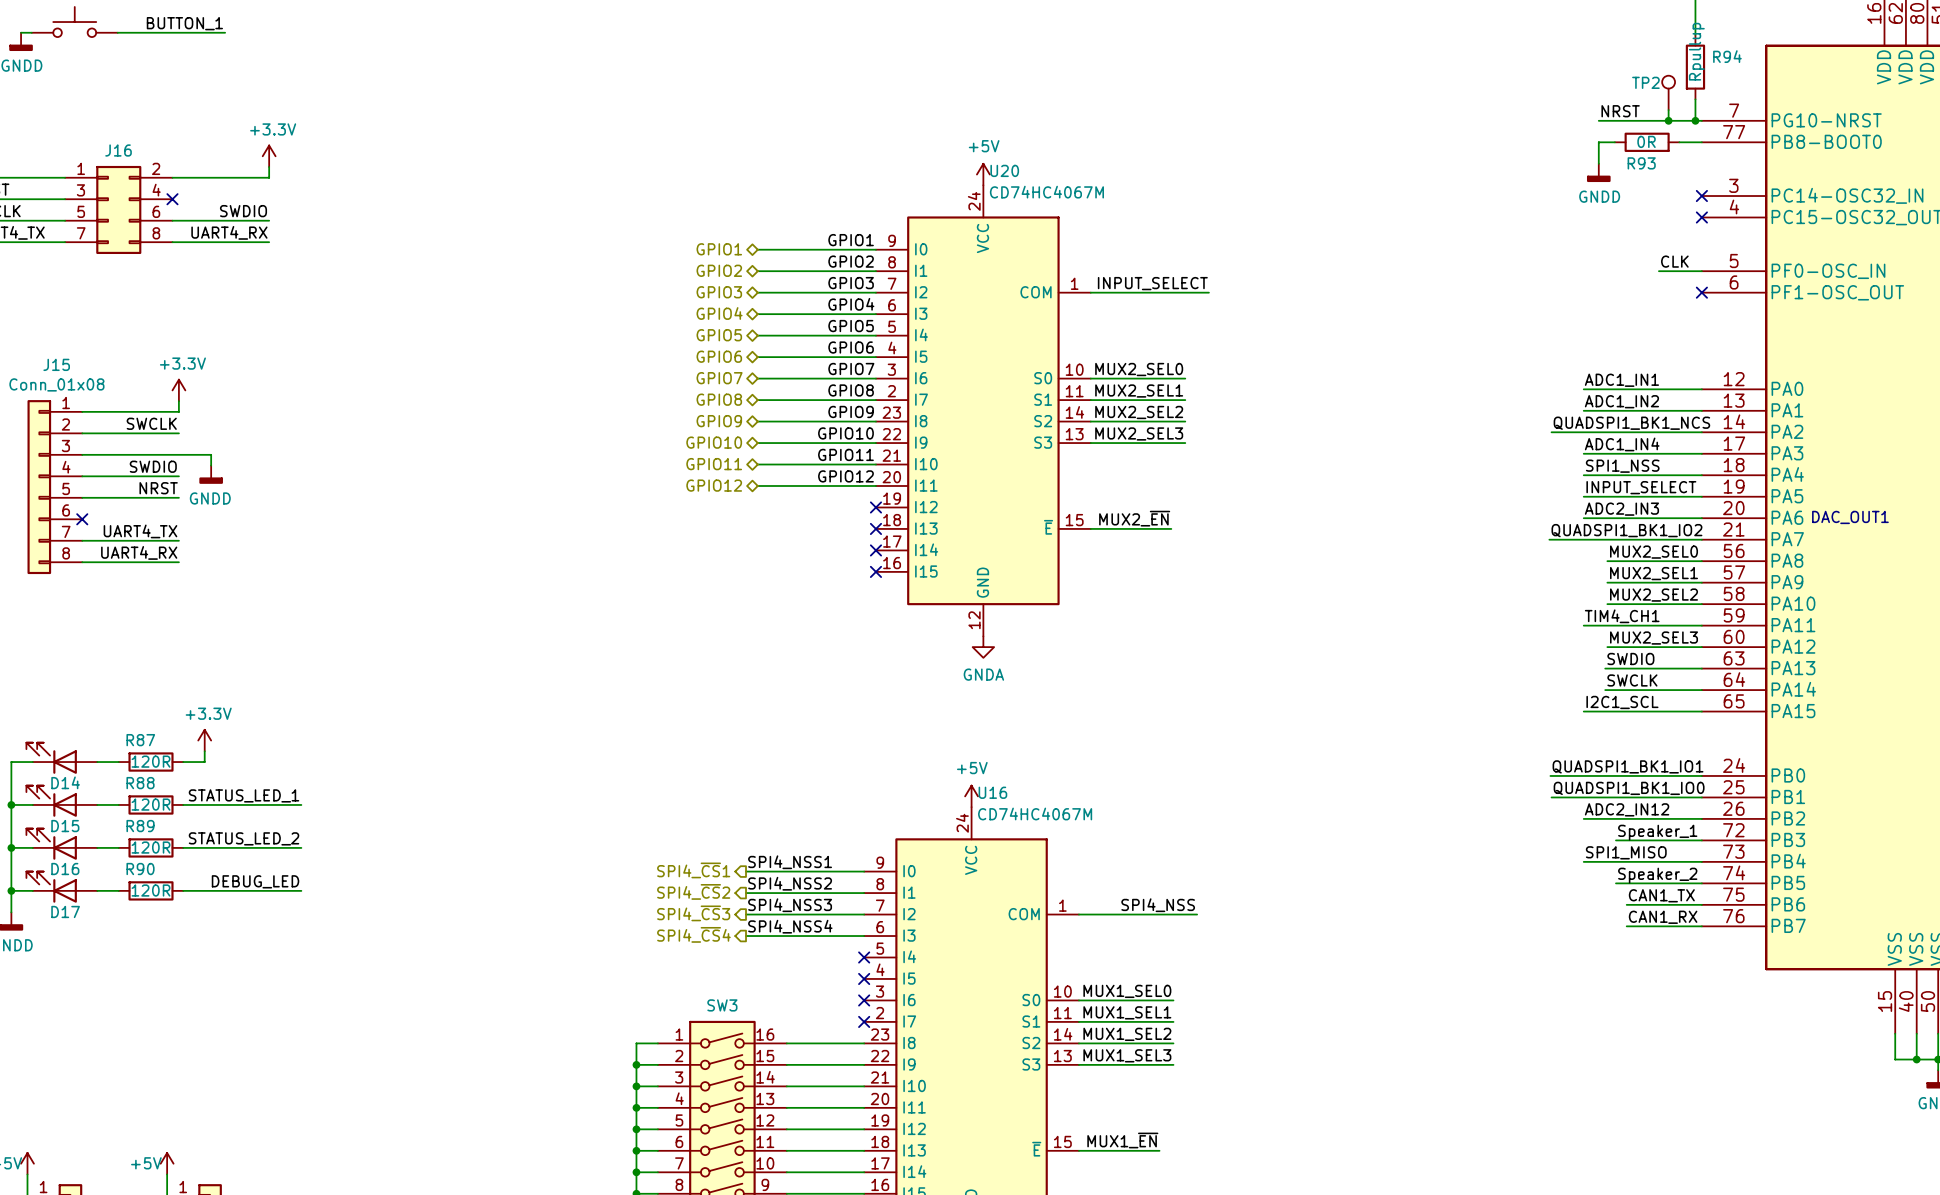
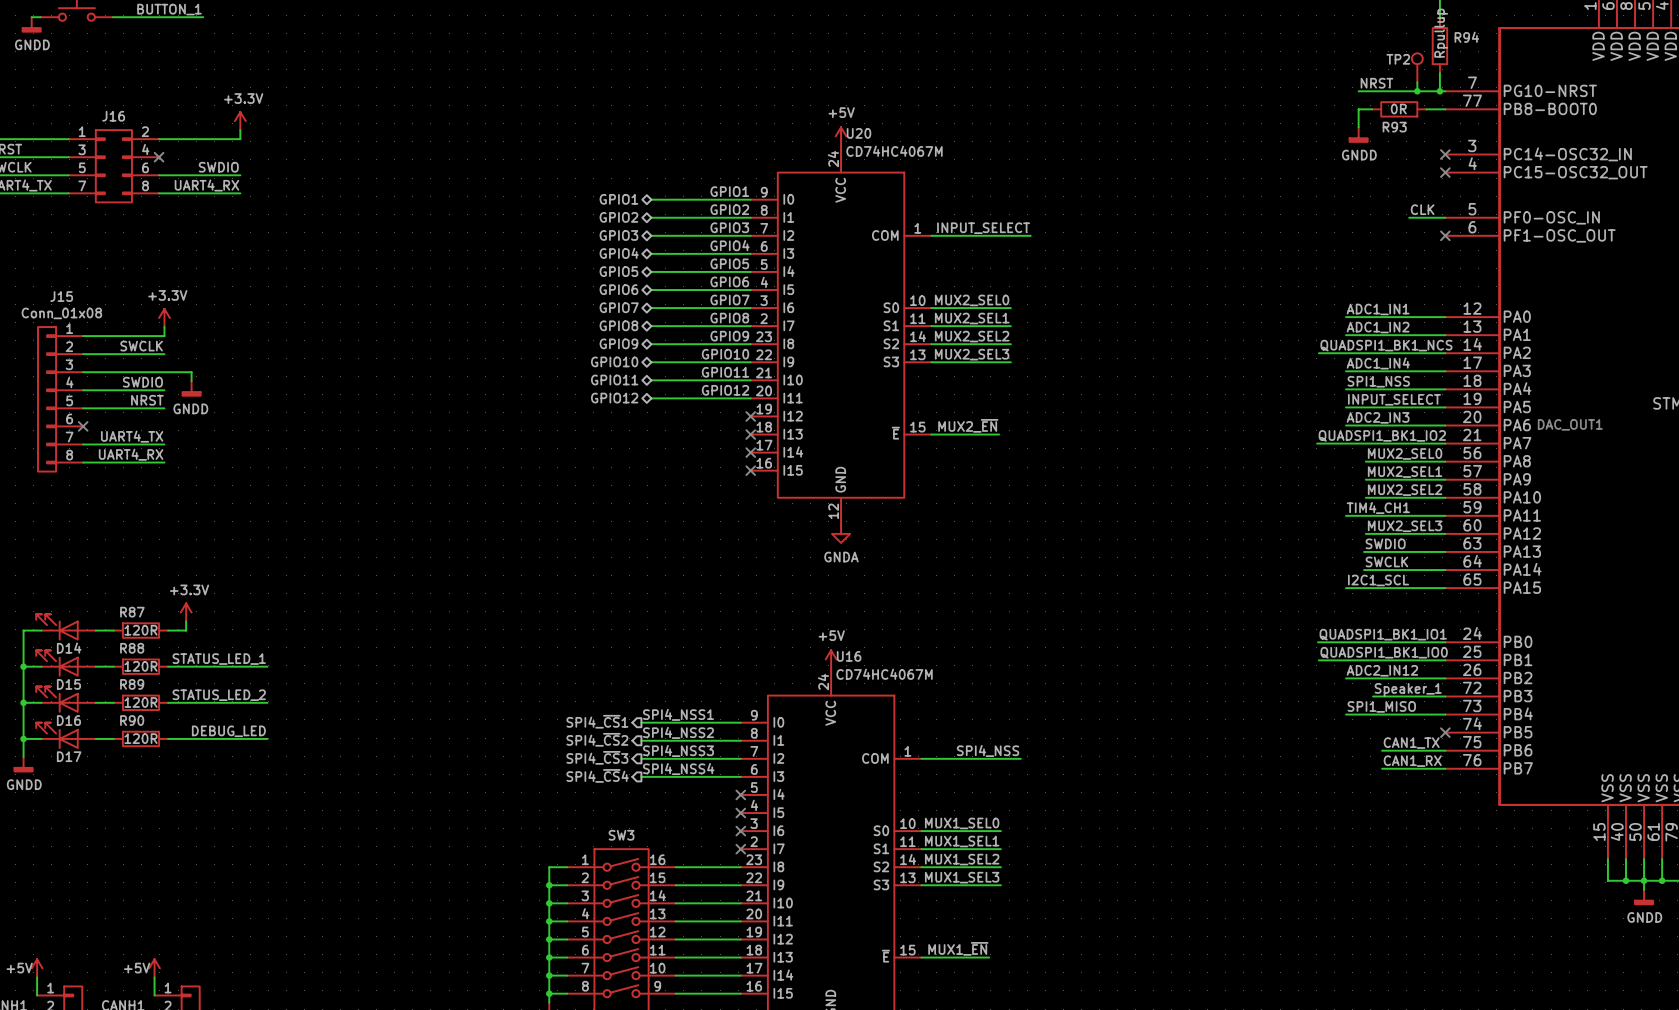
label: Speaker_2 (1657, 875) -> none
wire: (1615, 883) (1701, 883) -> none
no-connect mark: none -> (1445, 732)

